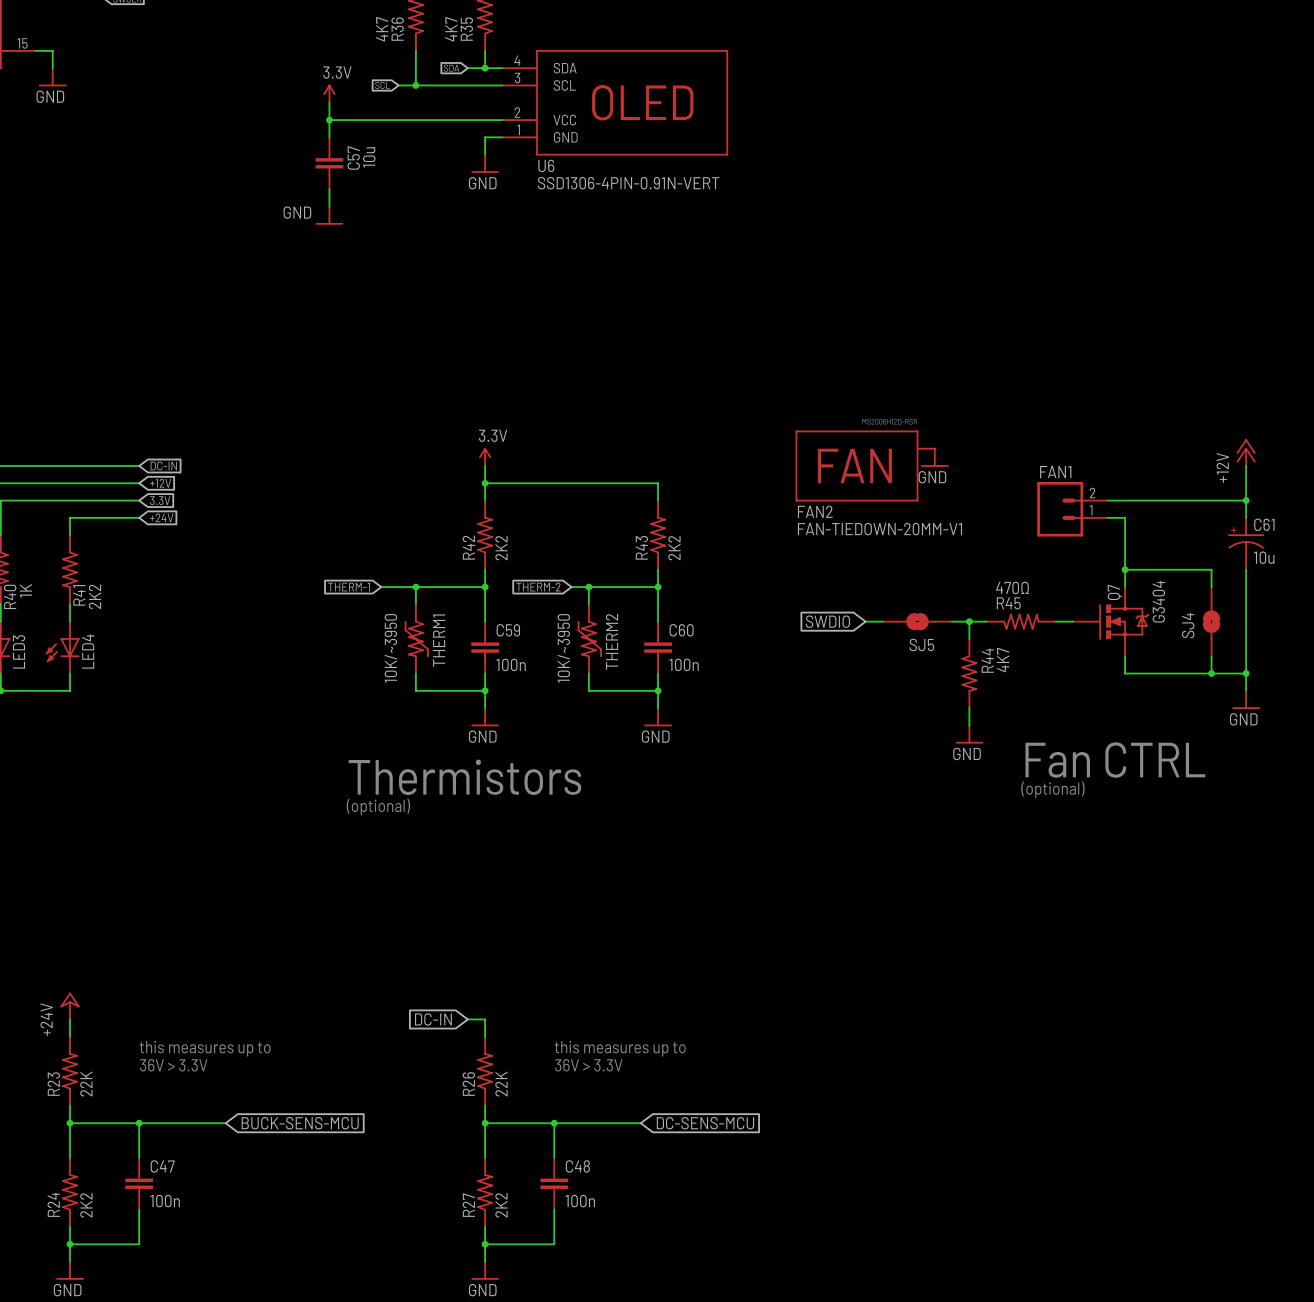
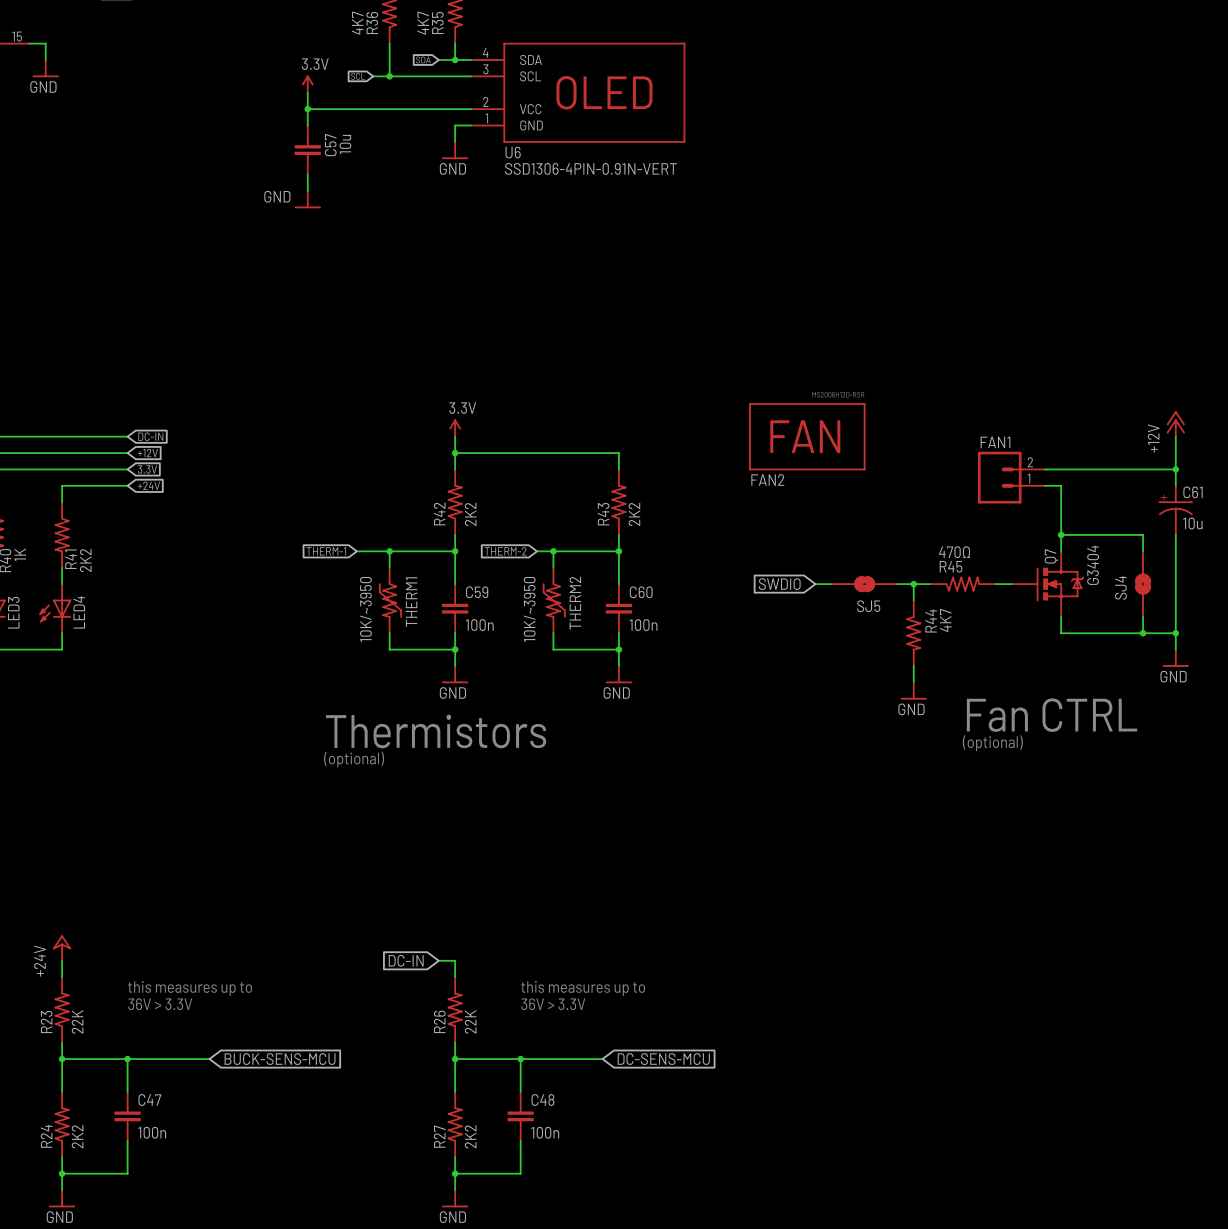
FAN2 symbol: [795, 430, 935, 502] -> [749, 403, 866, 471]
power symbol: GND (934, 457) -> none
FAN2 value: FAN-TIEDOWN-20MM-V1 (879, 529) -> none

